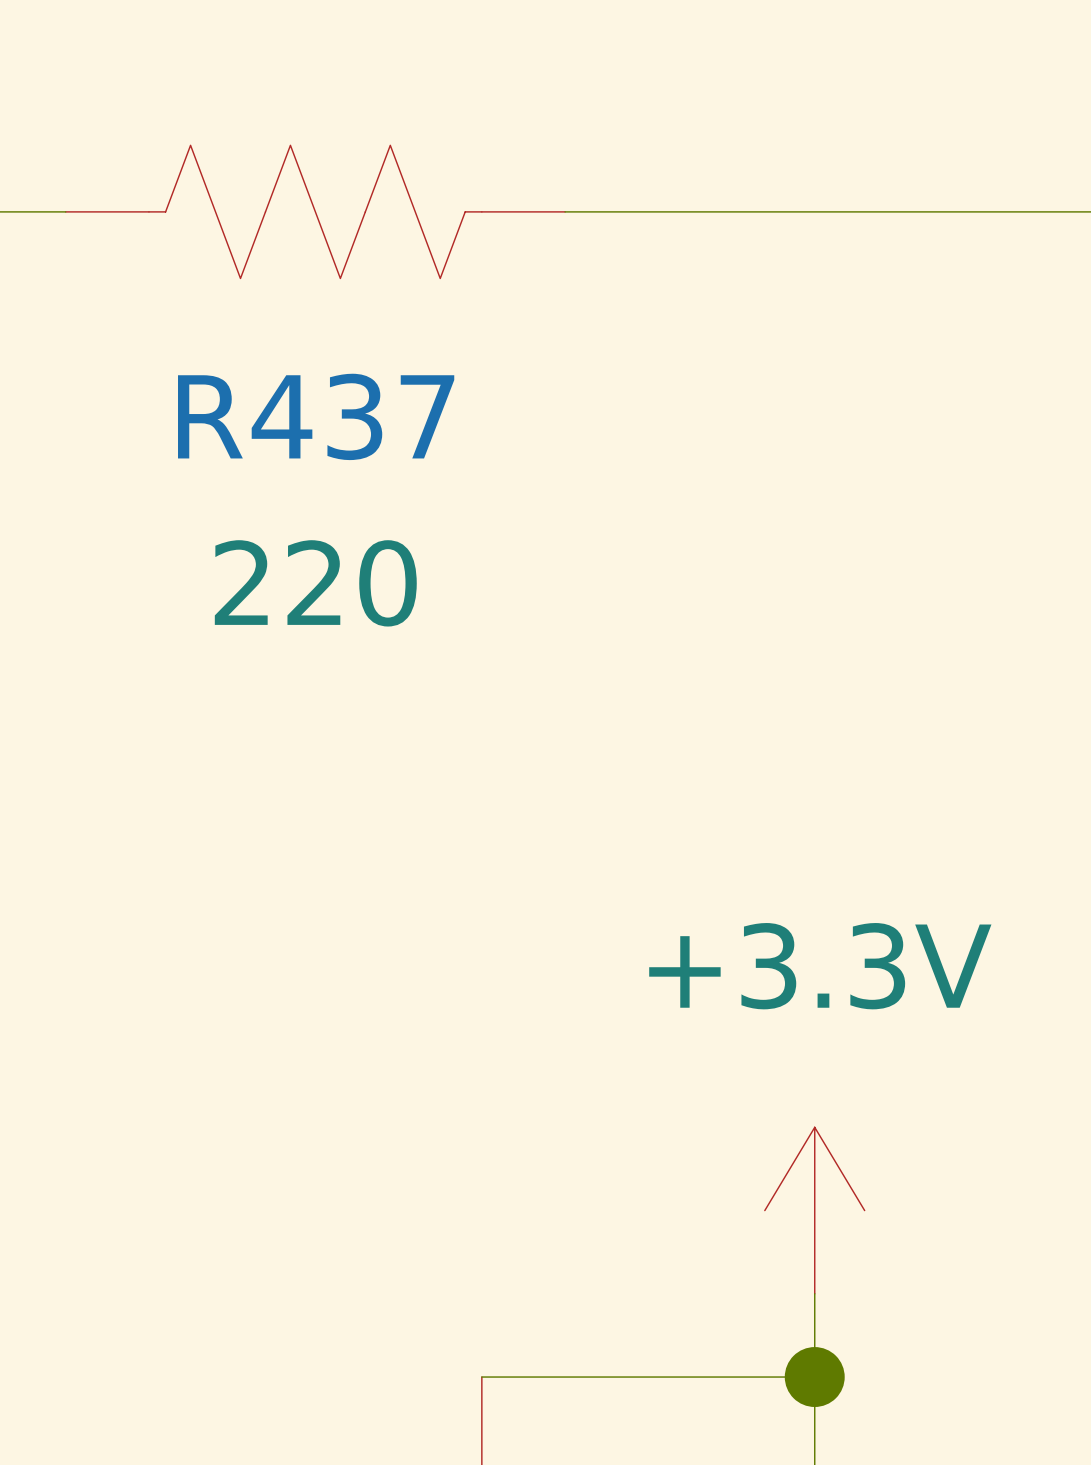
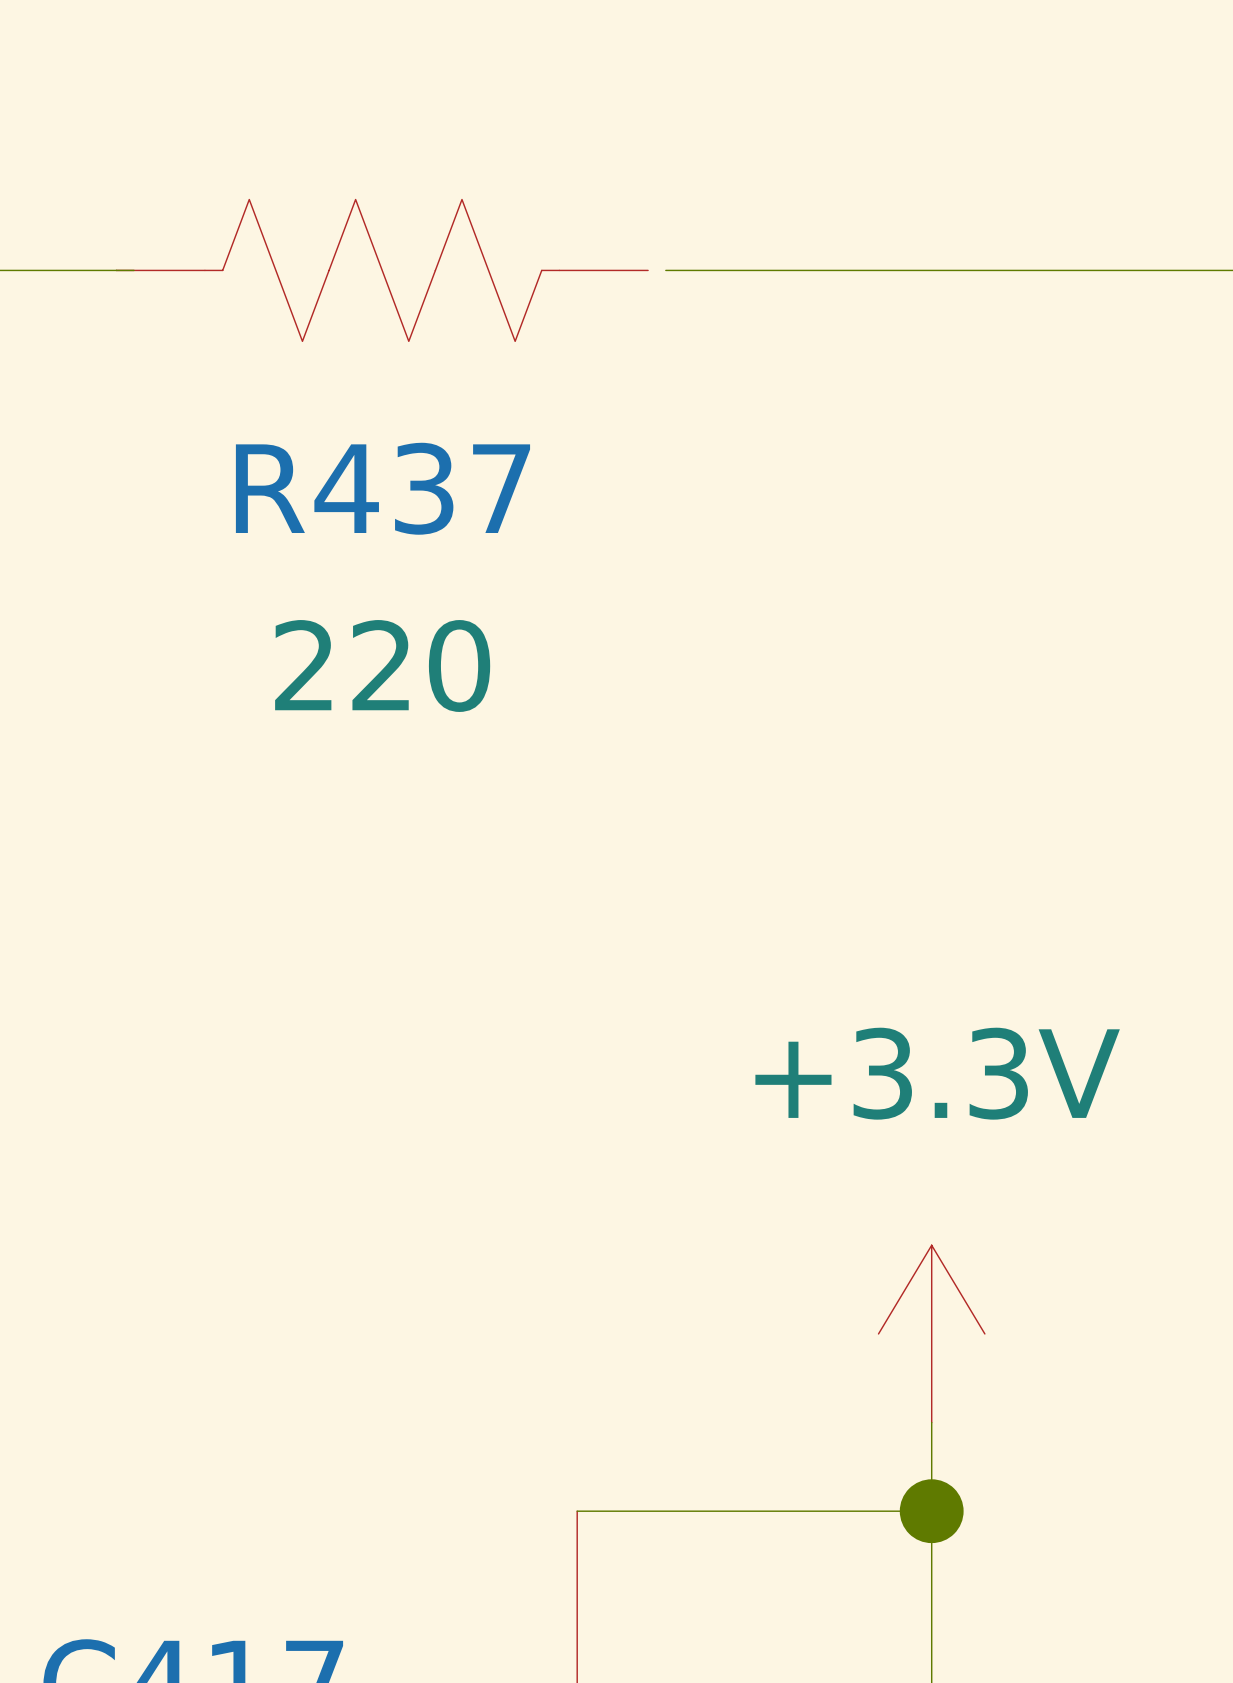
R437 position: (315, 211) -> (382, 270)

